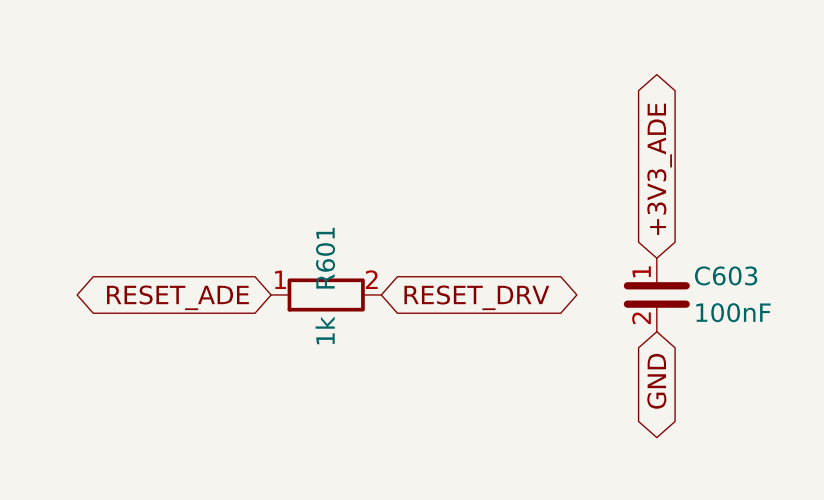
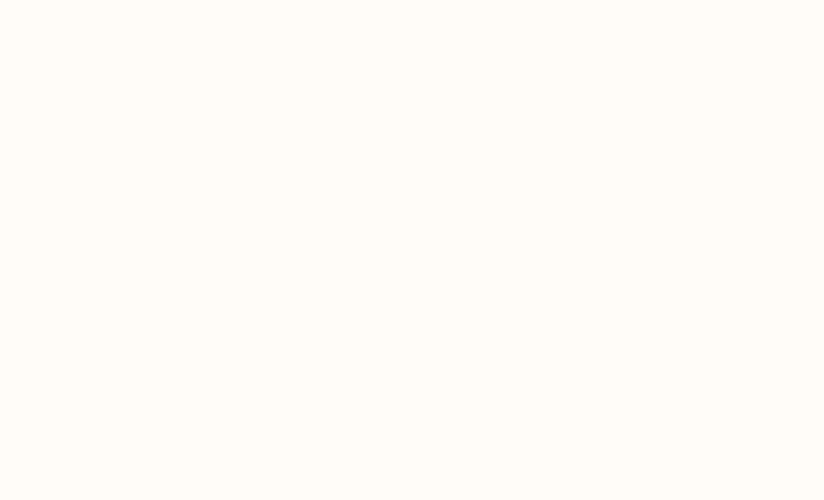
global label: +3V3_ADE (659, 169) -> none
R601: 1k (326, 294) -> none
C603: 100nF (656, 294) -> none
global label: RESET_ADE (177, 297) -> none
global label: RESET_DRV (476, 297) -> none
global label: GND (656, 381) -> none

